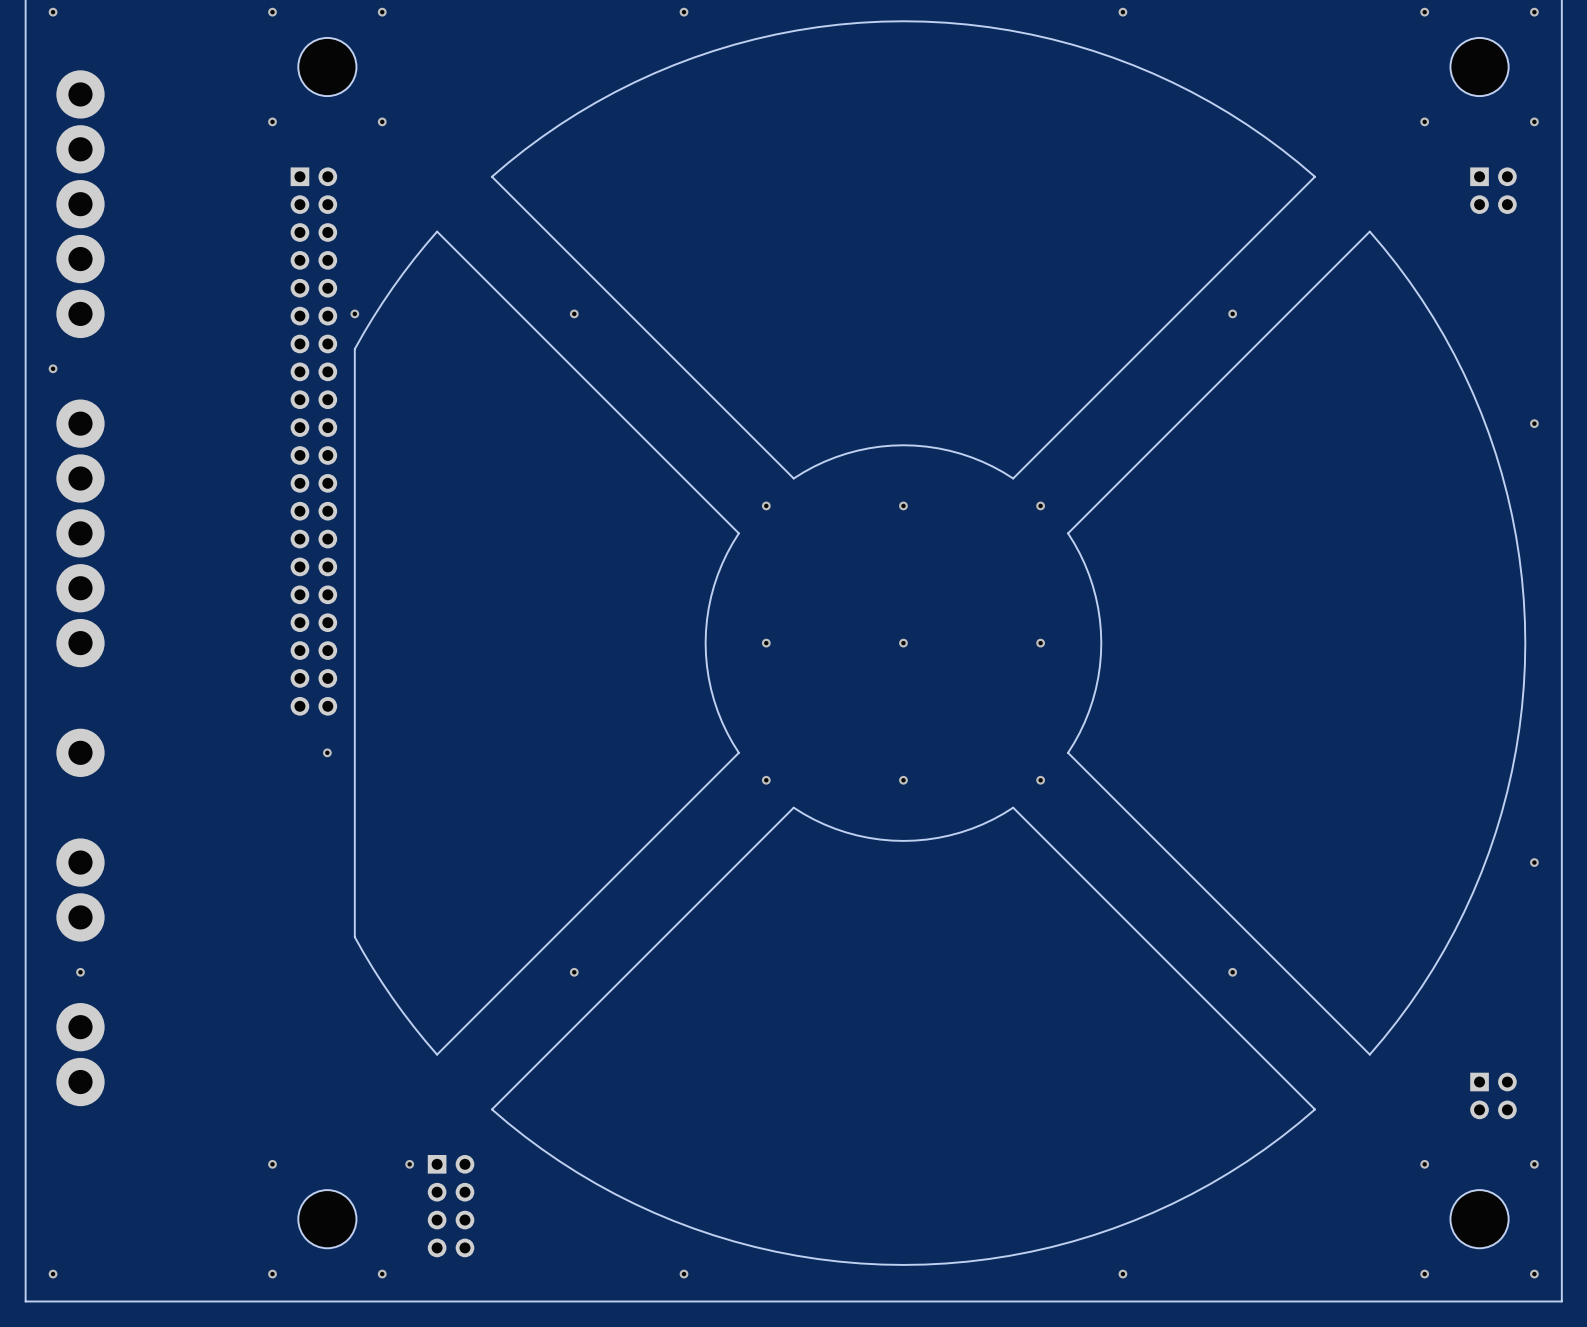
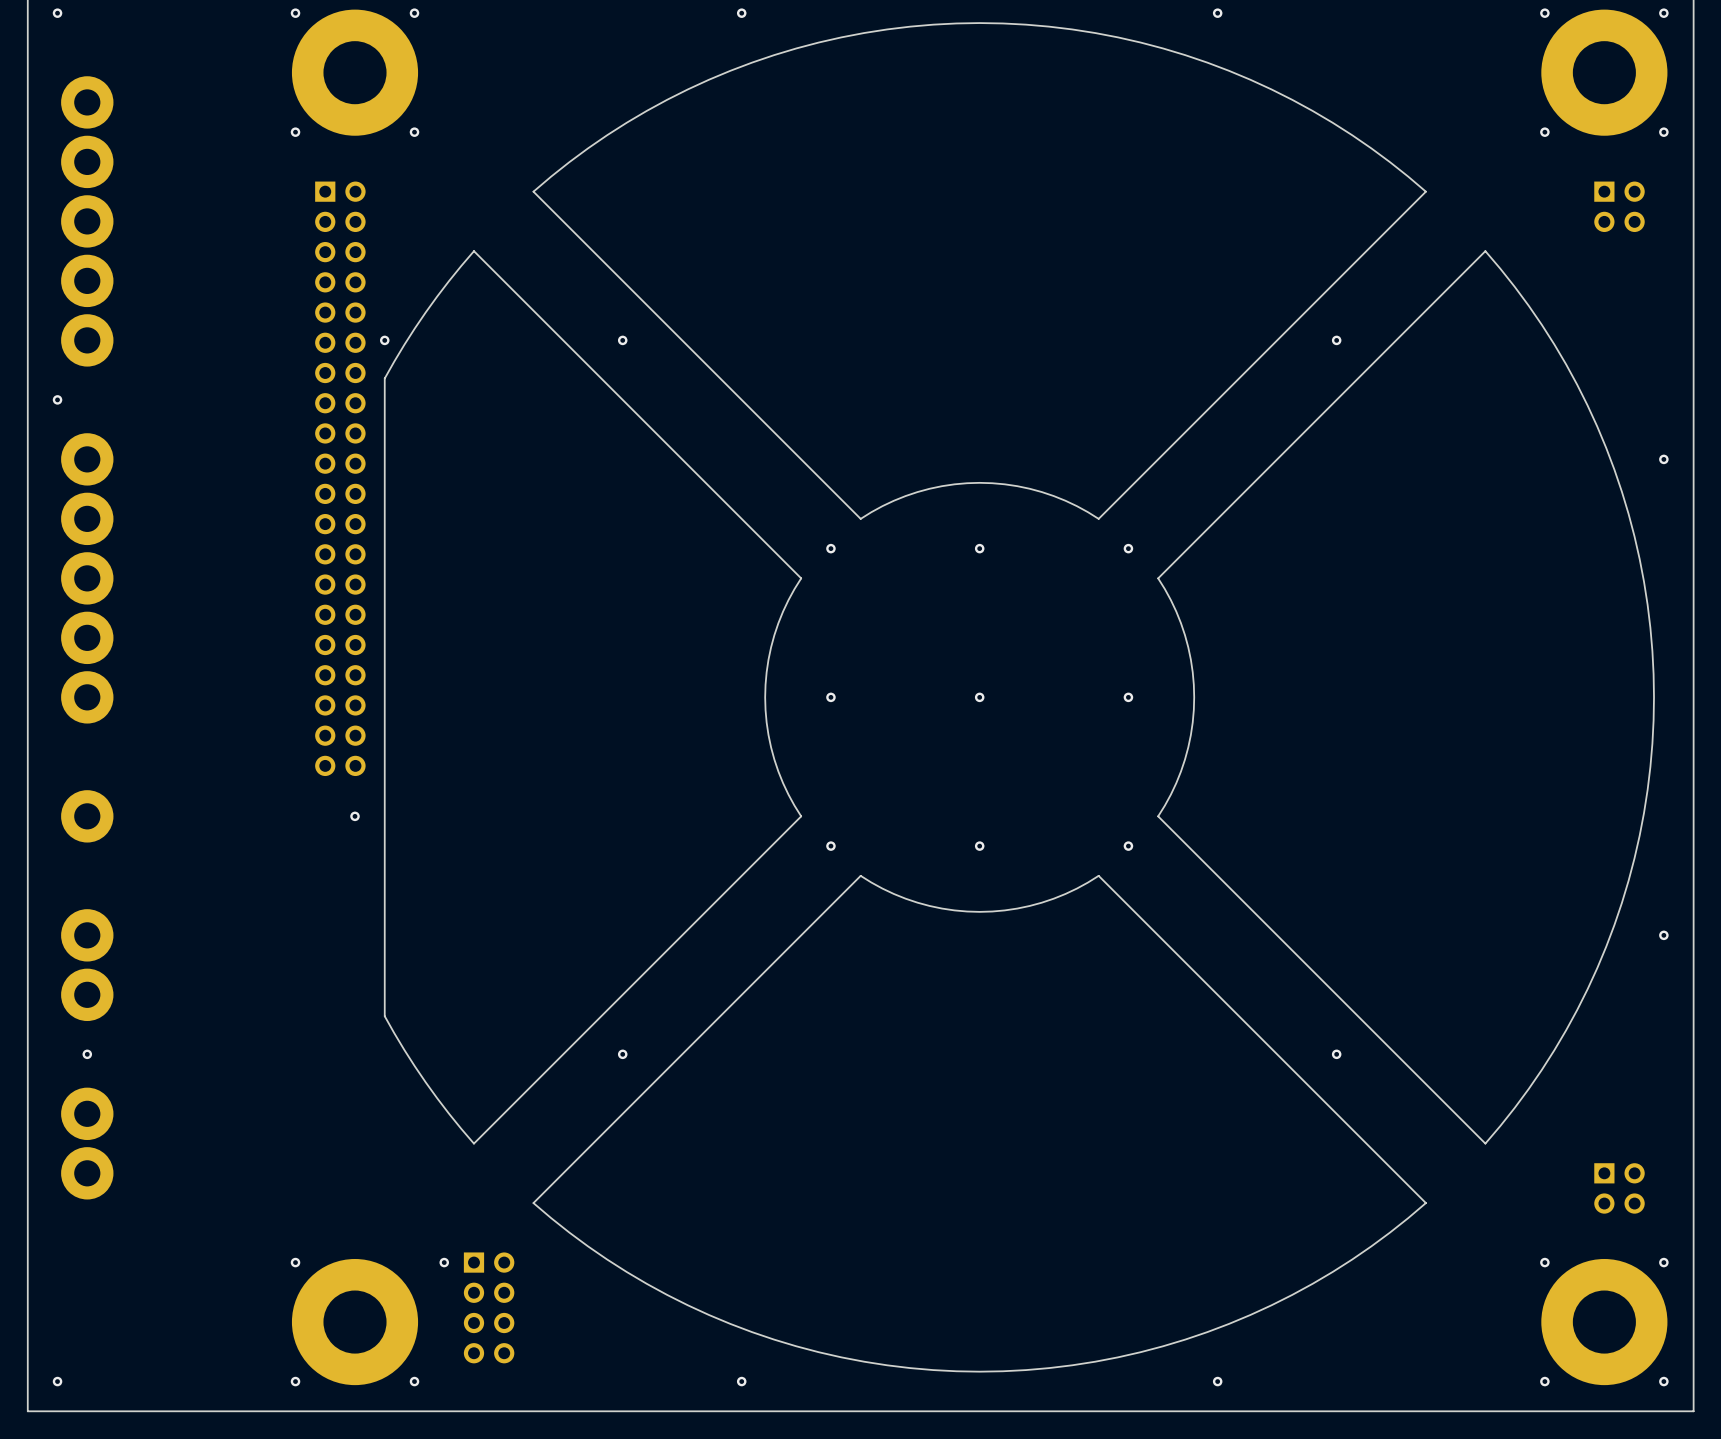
part footprint: [298, 37, 357, 97] -> [291, 9, 419, 136]
part footprint: [1450, 37, 1509, 97] -> [1541, 9, 1668, 136]
part footprint: [298, 1190, 357, 1249] -> [291, 1258, 419, 1386]
part footprint: [1450, 1190, 1509, 1249] -> [1541, 1258, 1668, 1386]

